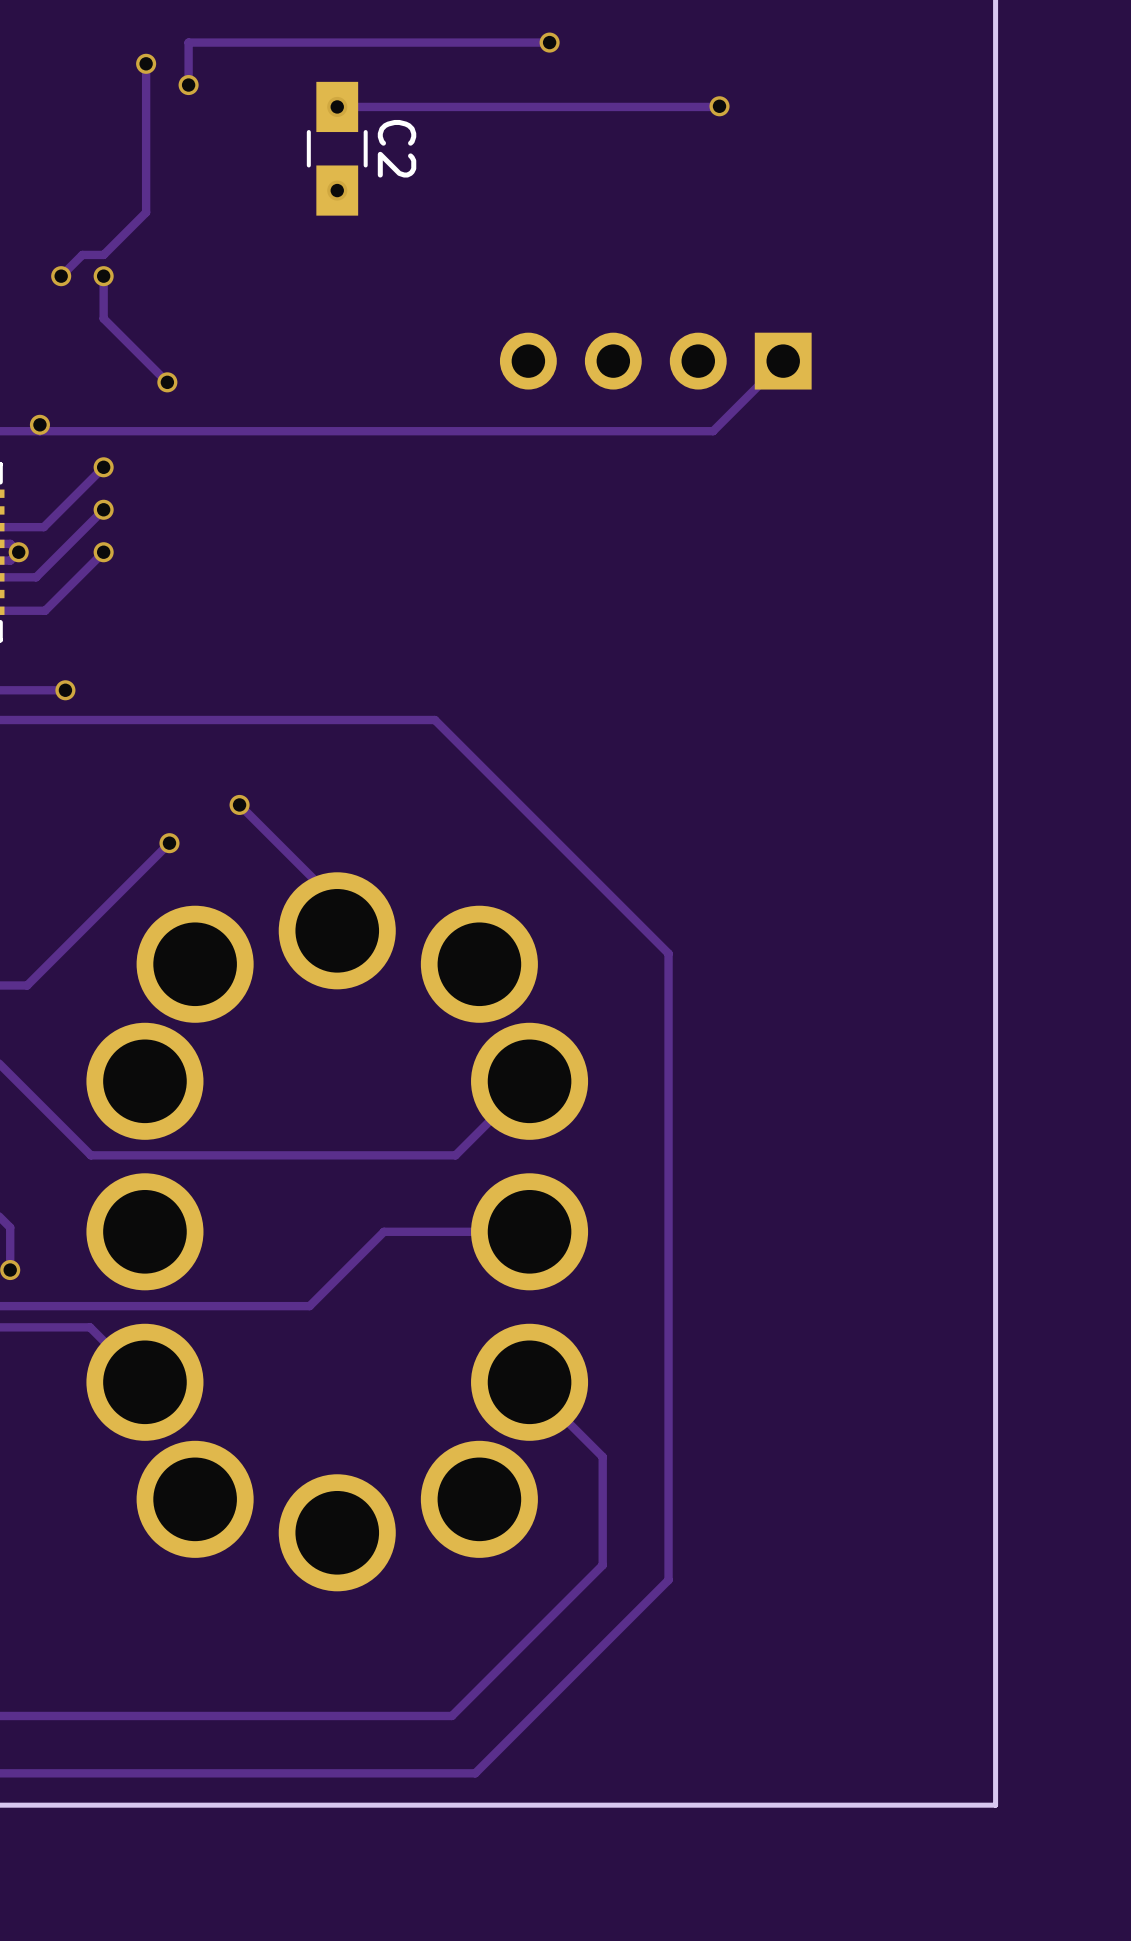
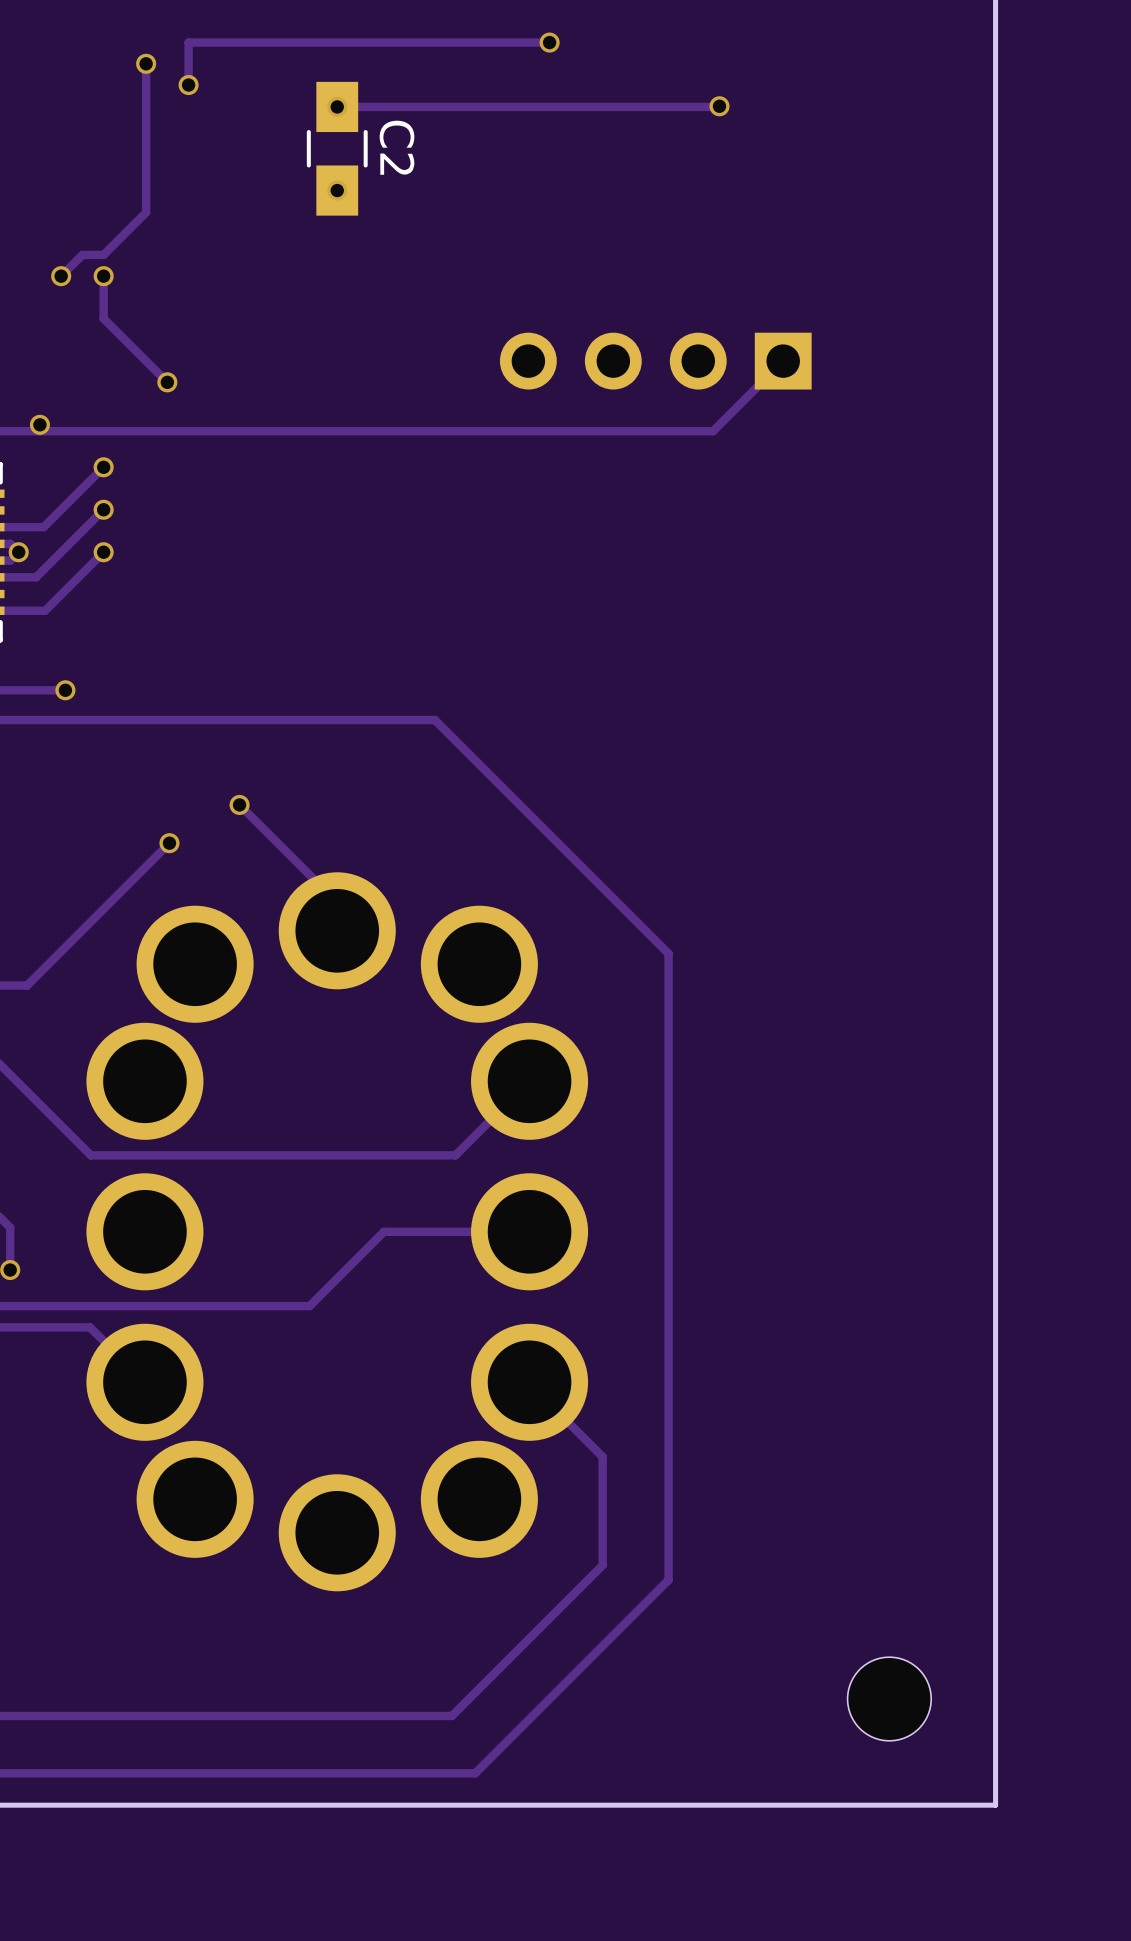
part: none -> (889, 1699)

